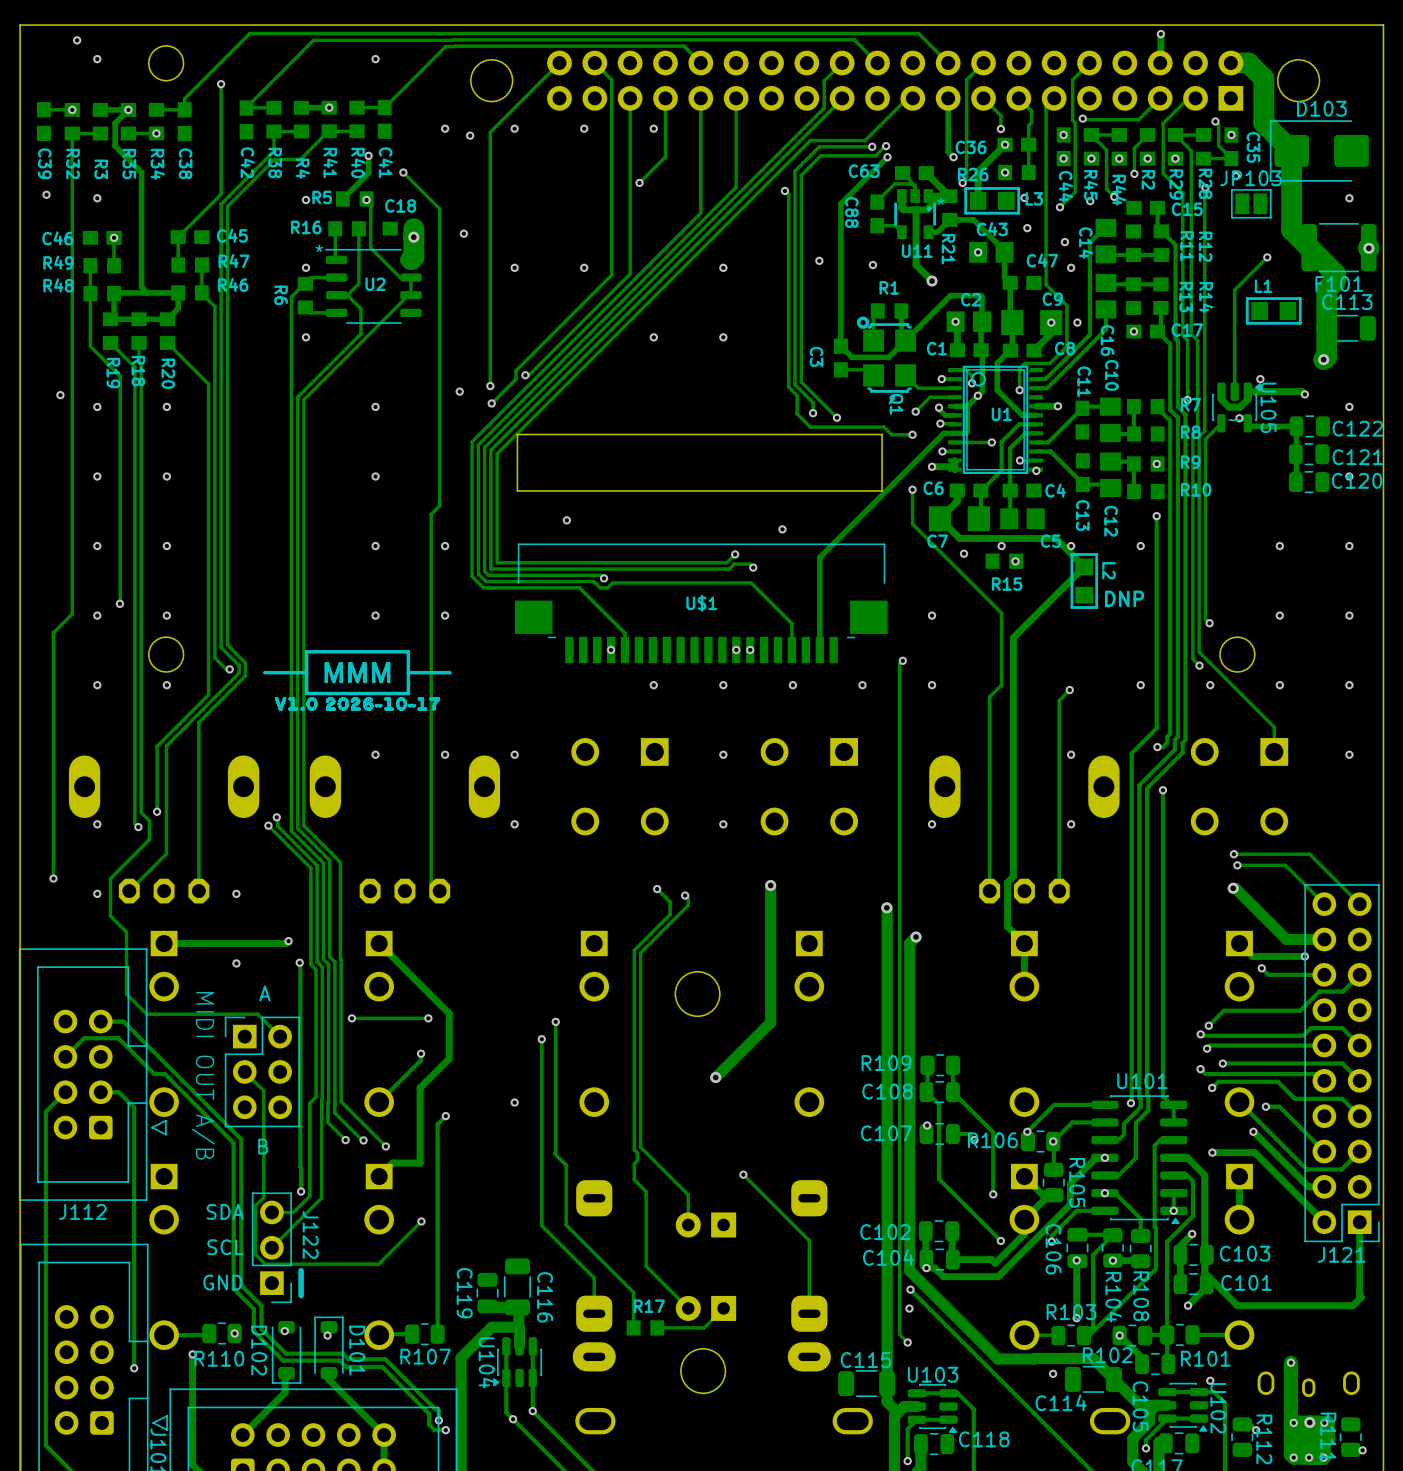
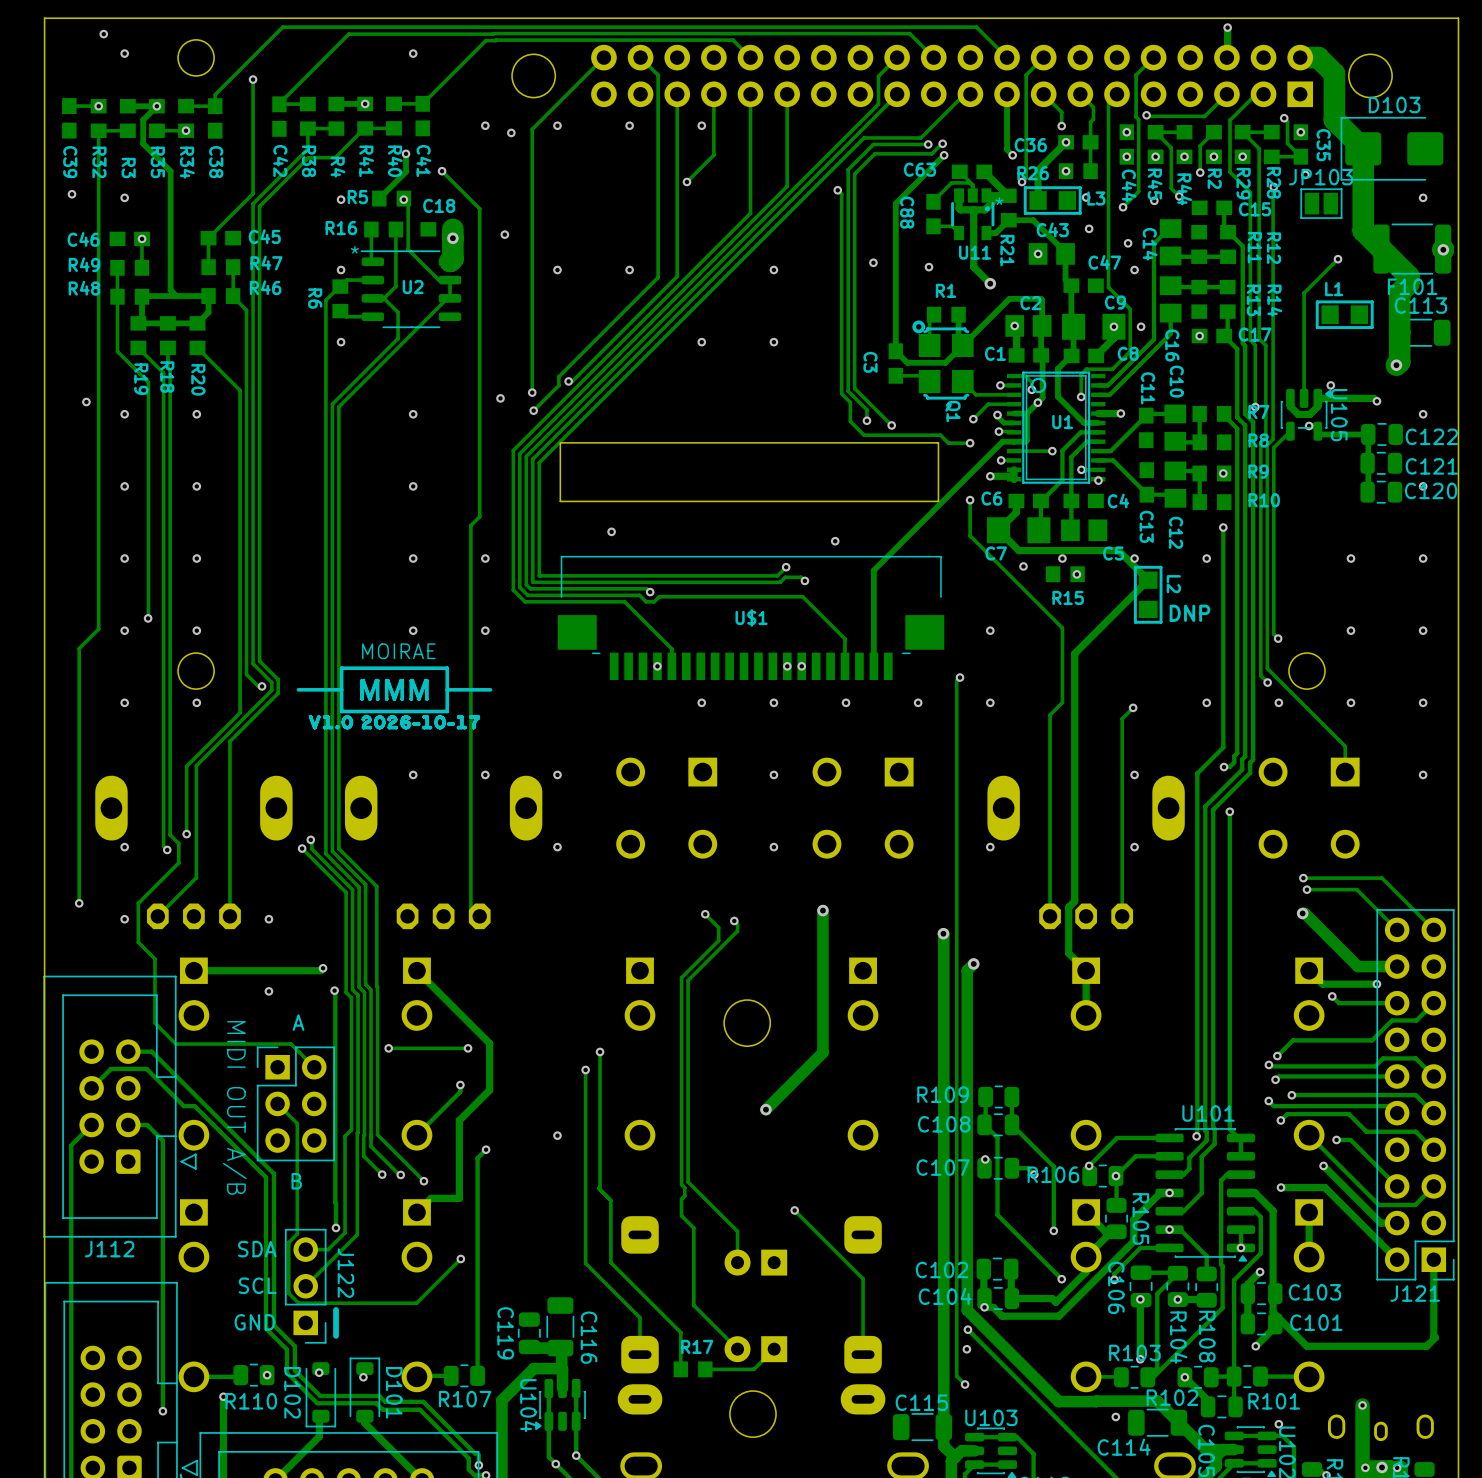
text: none -> MOIRAE (398, 651)

